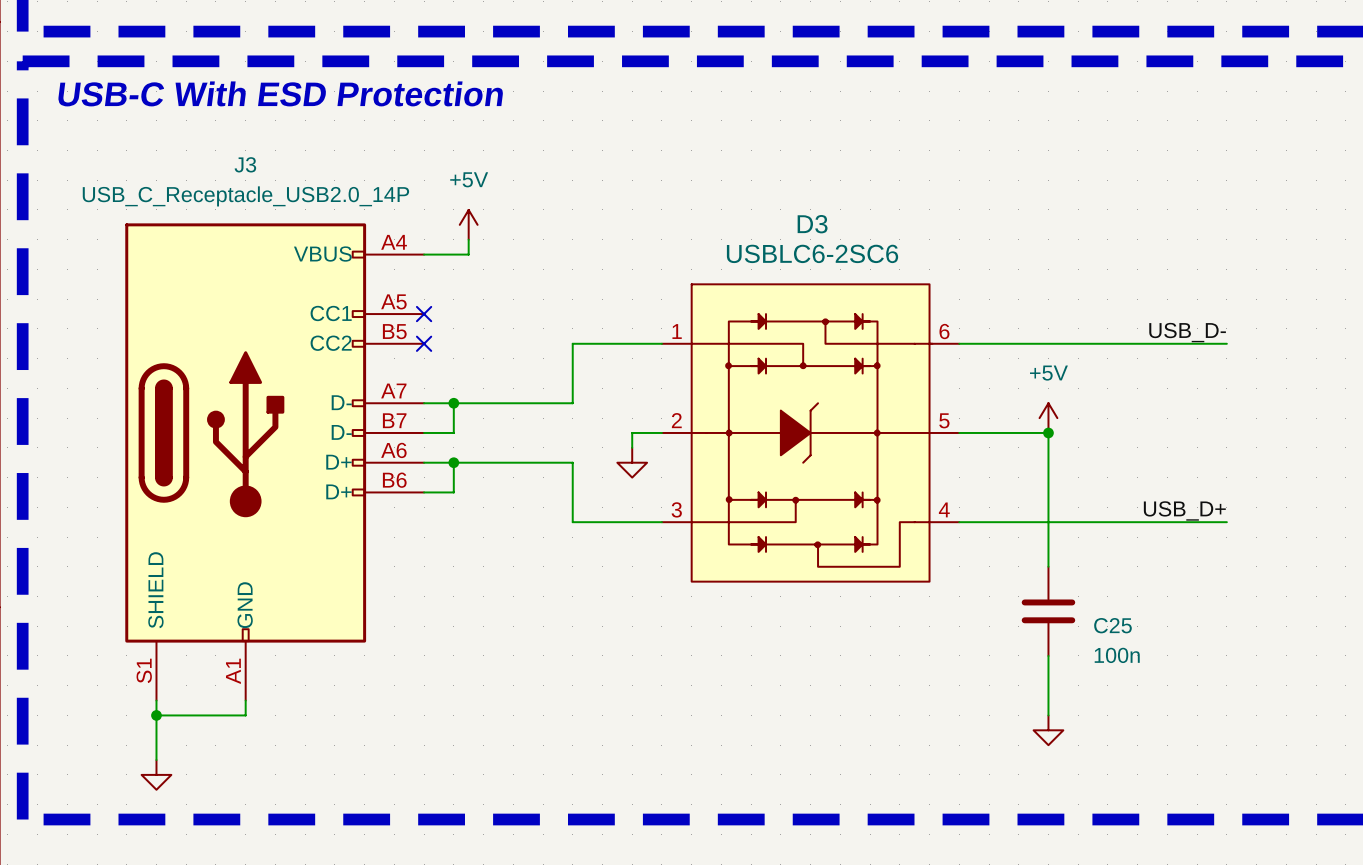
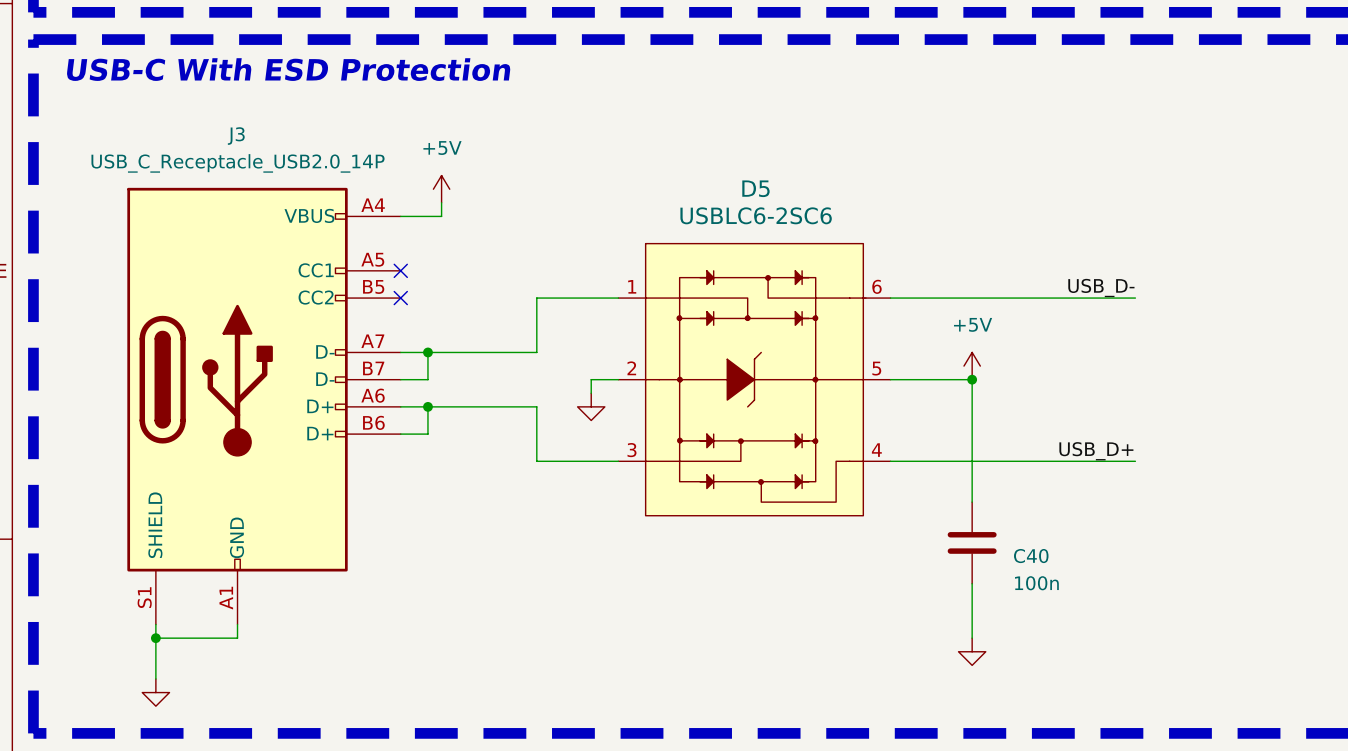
D3 name: D3 (812, 224) -> D5 (755, 188)
C25 name: C25 (1112, 625) -> C40 (1031, 556)

